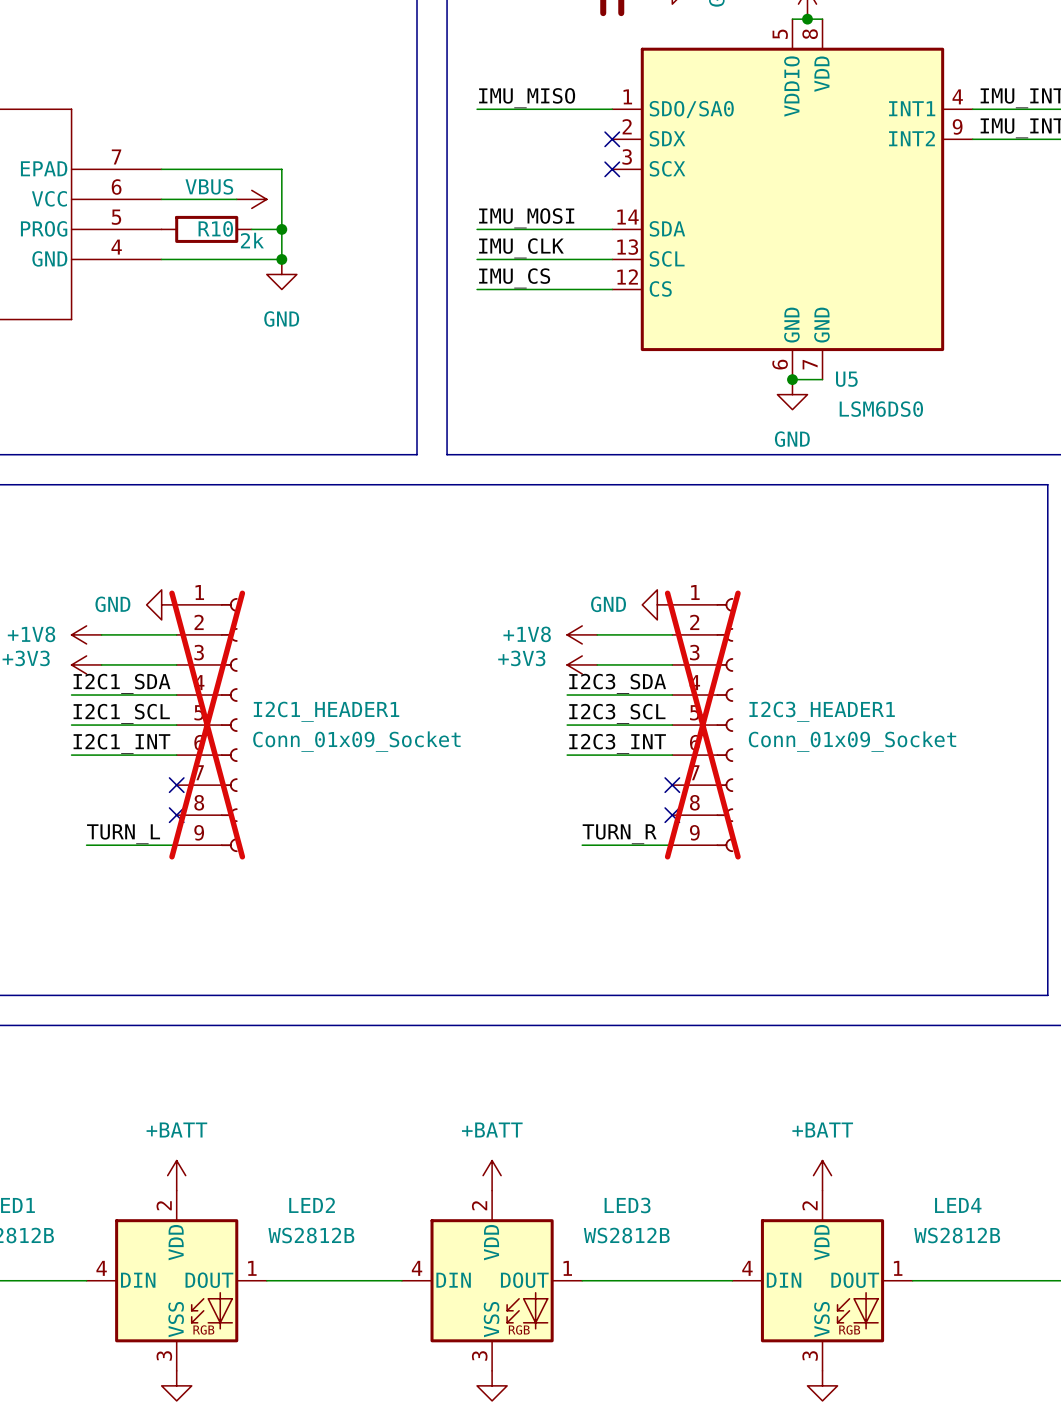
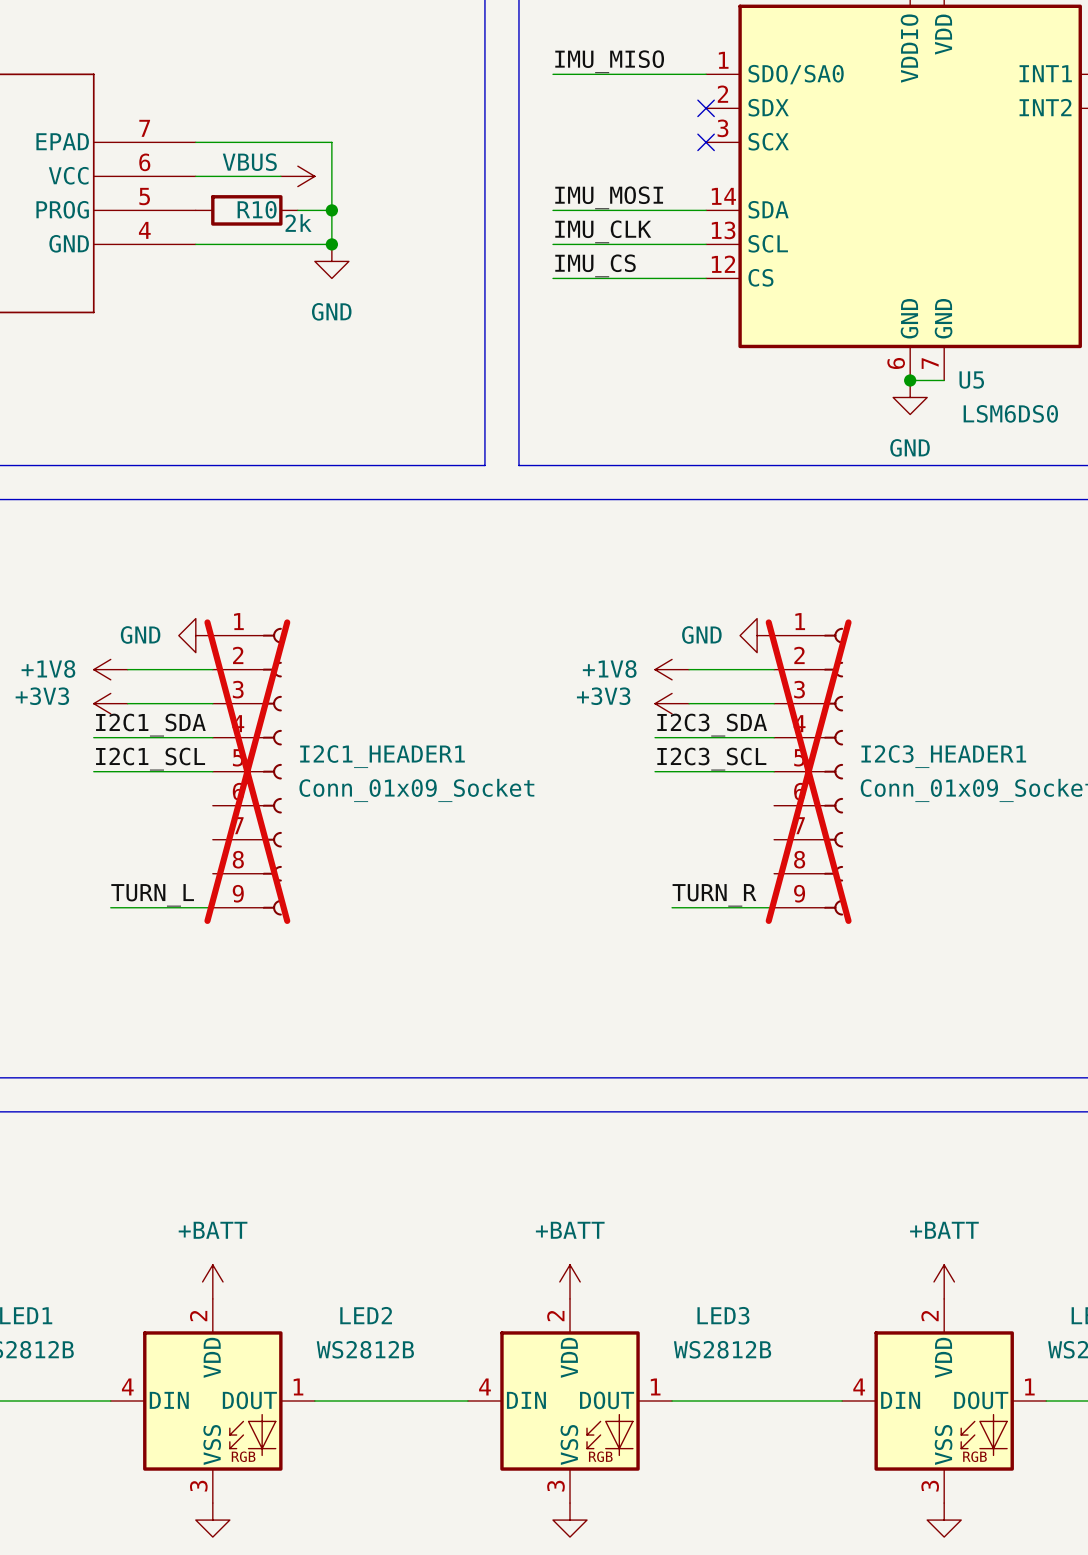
label: I2C1_INT (121, 743) -> none
label: I2C3_INT (617, 743) -> none
wire: (71, 755) (176, 755) -> none
wire: (567, 755) (672, 755) -> none
no-connect mark: (176, 785) -> none
no-connect mark: (672, 785) -> none
no-connect mark: (176, 815) -> none
no-connect mark: (672, 815) -> none

